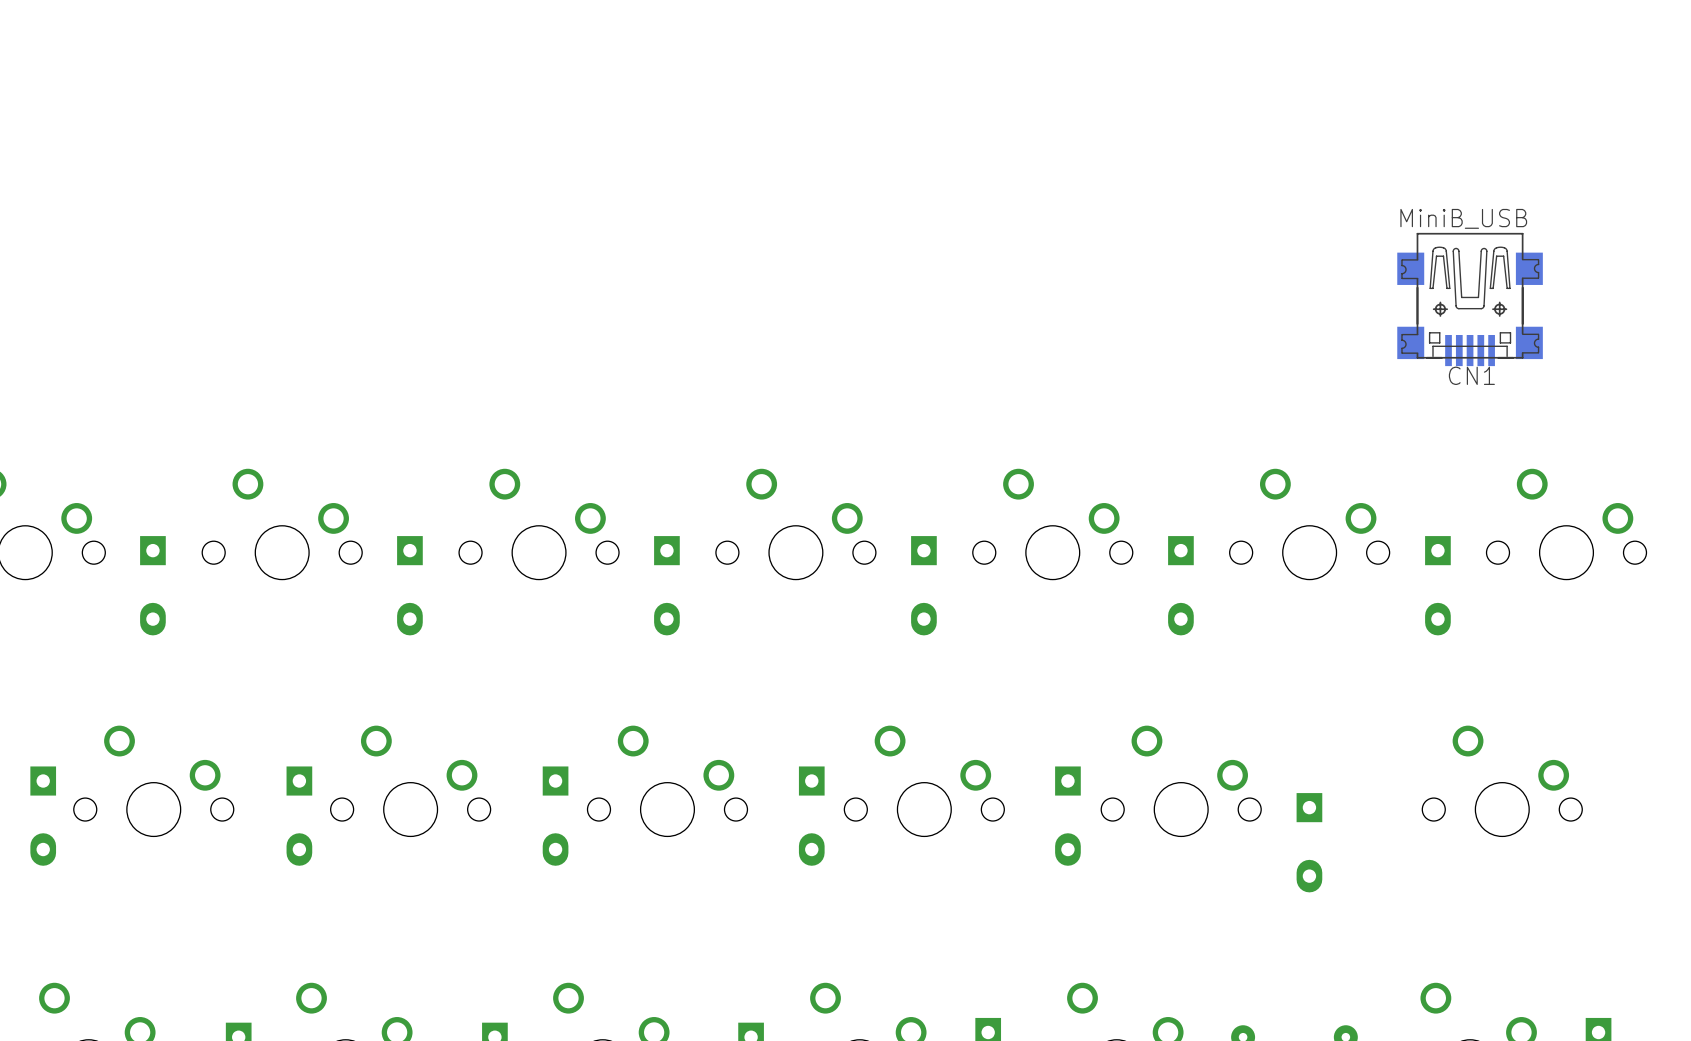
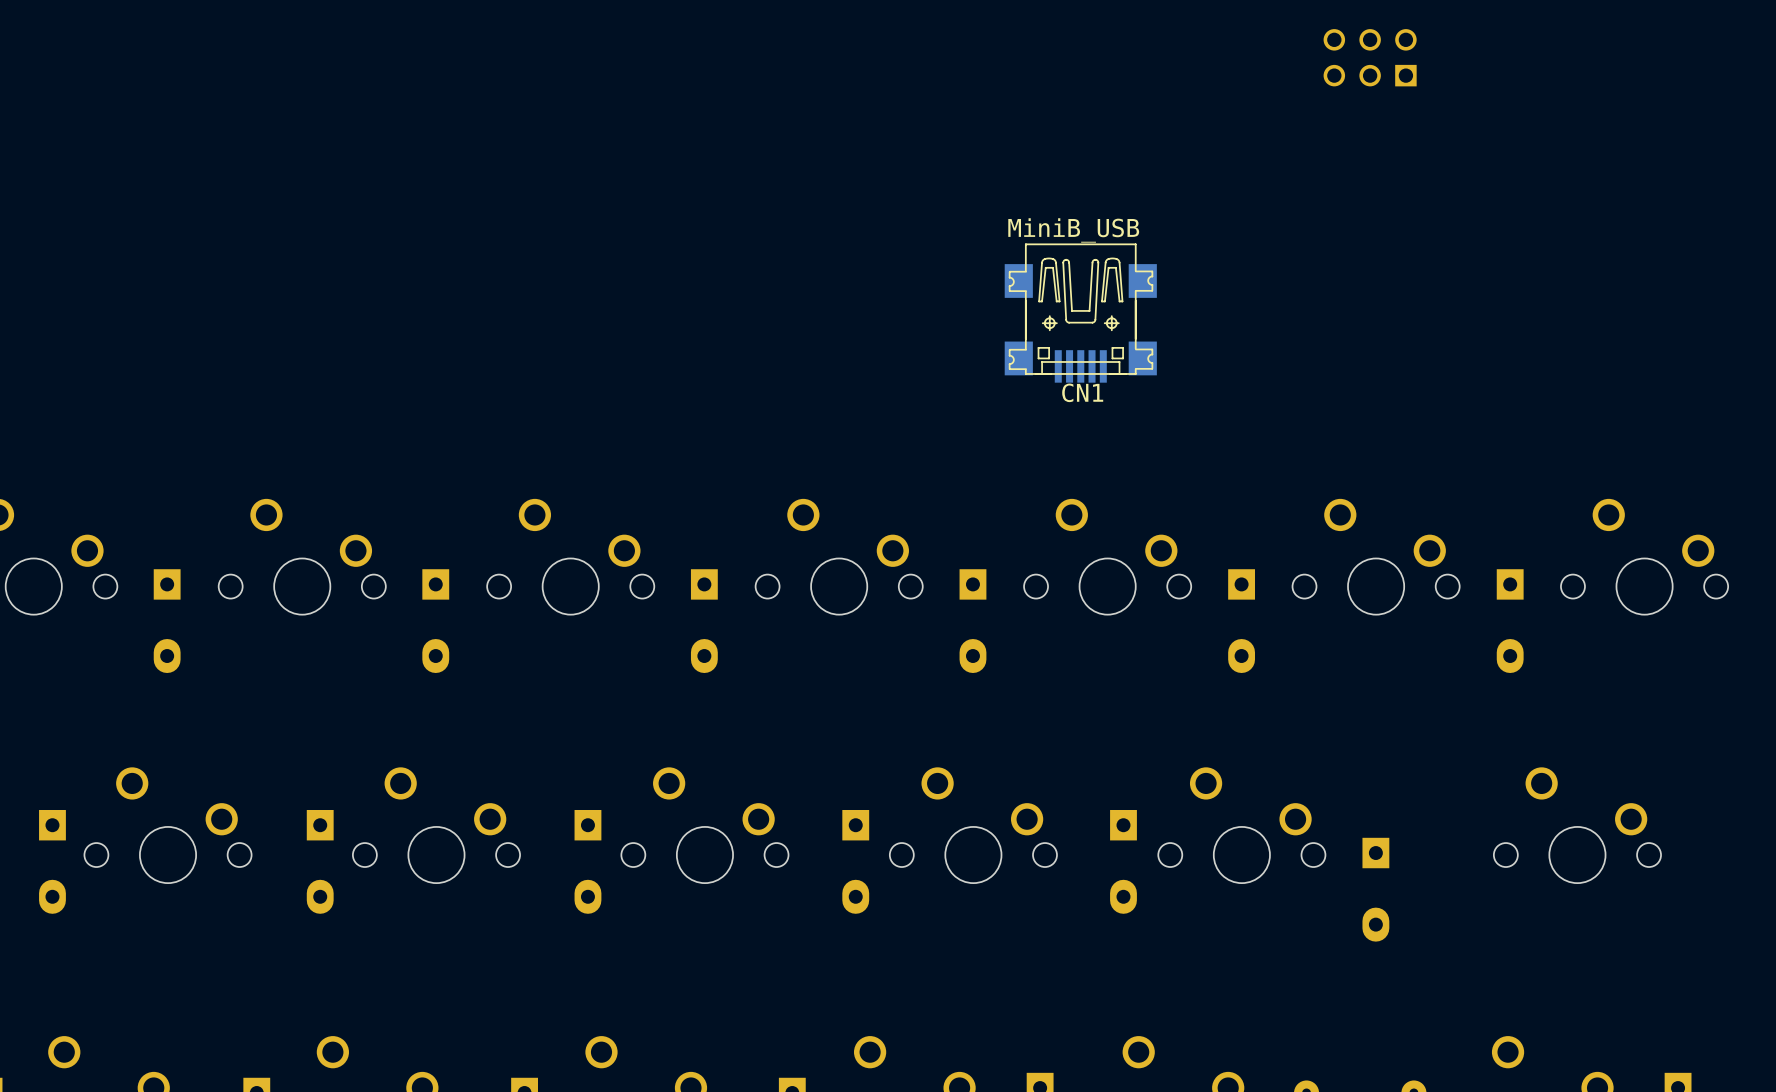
part: none -> (1370, 57)
CN1 position: (1470, 299) -> (1080, 313)

